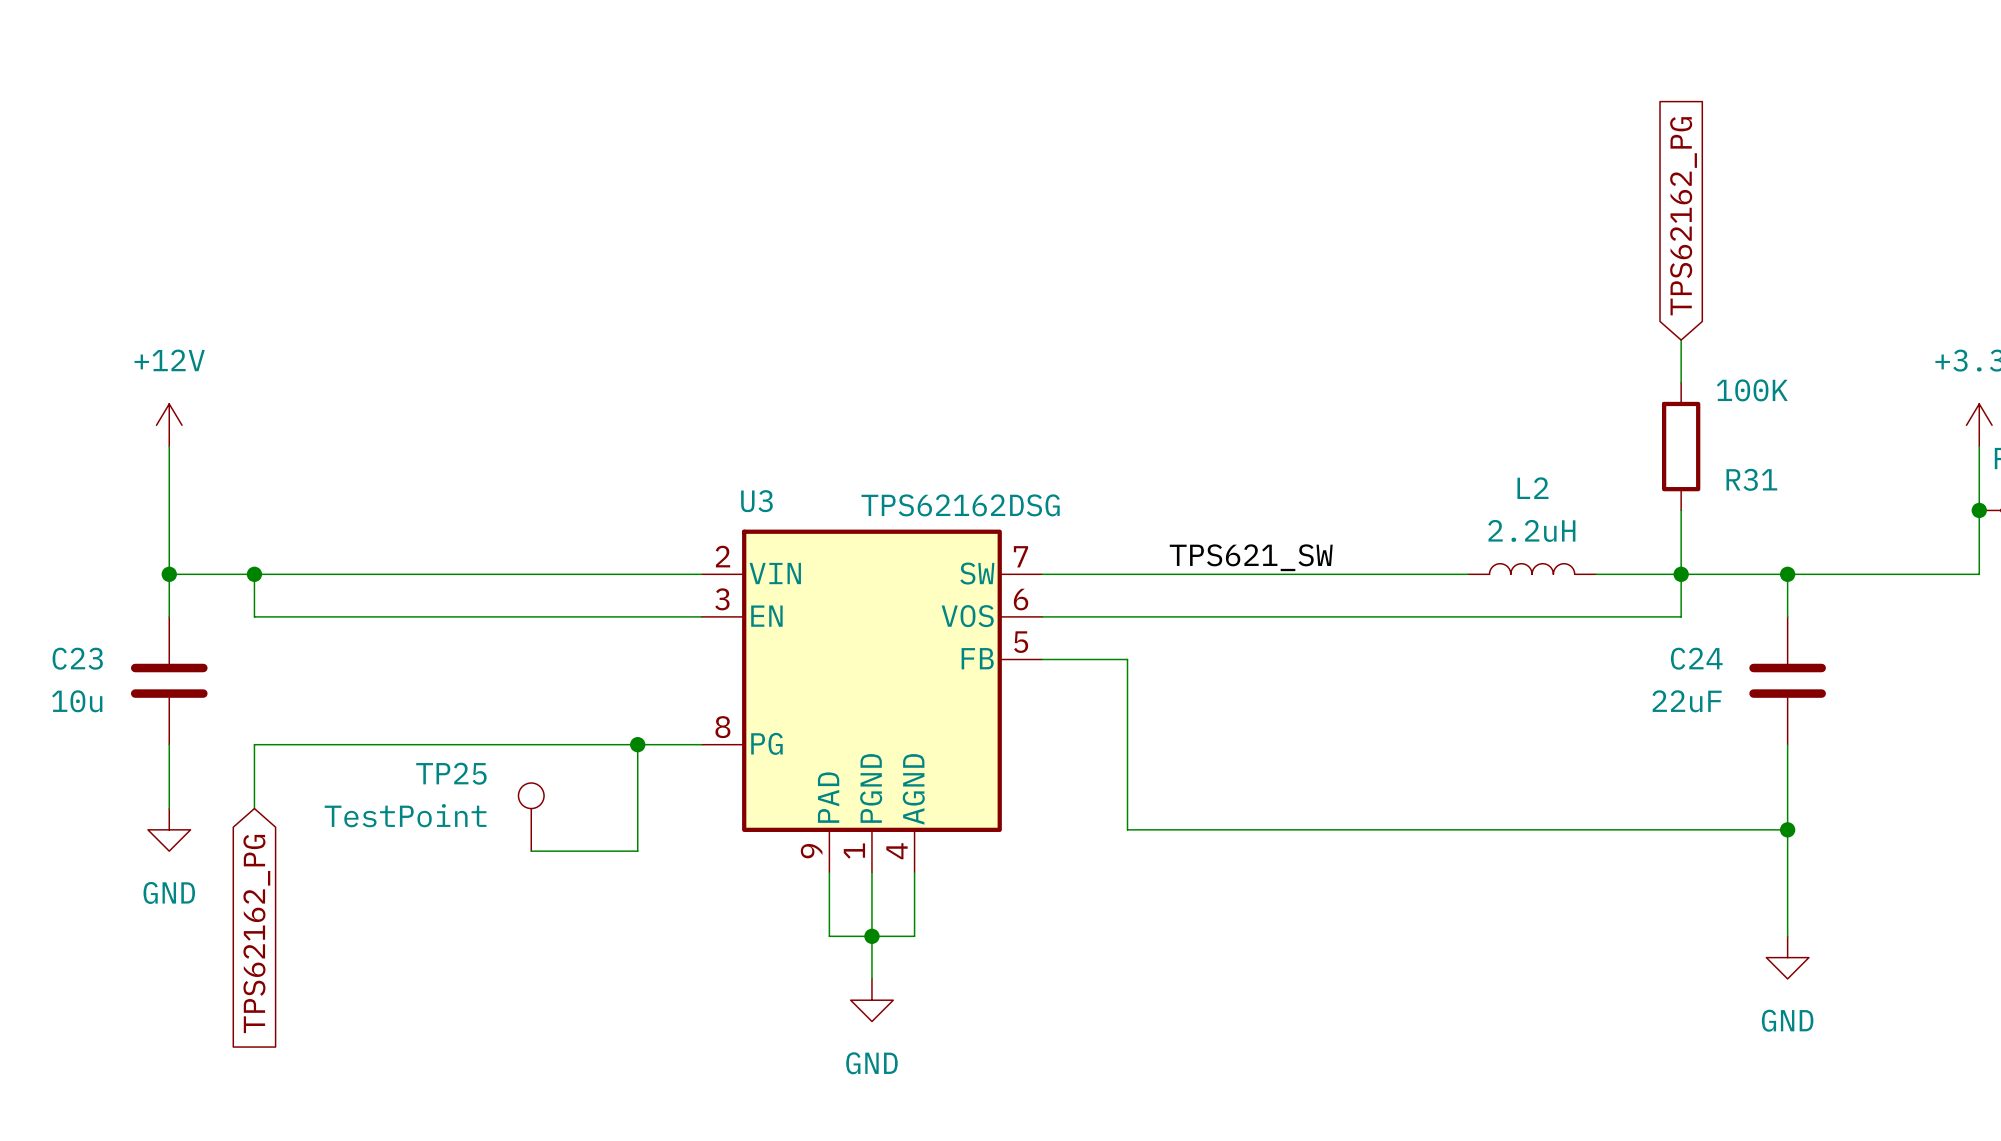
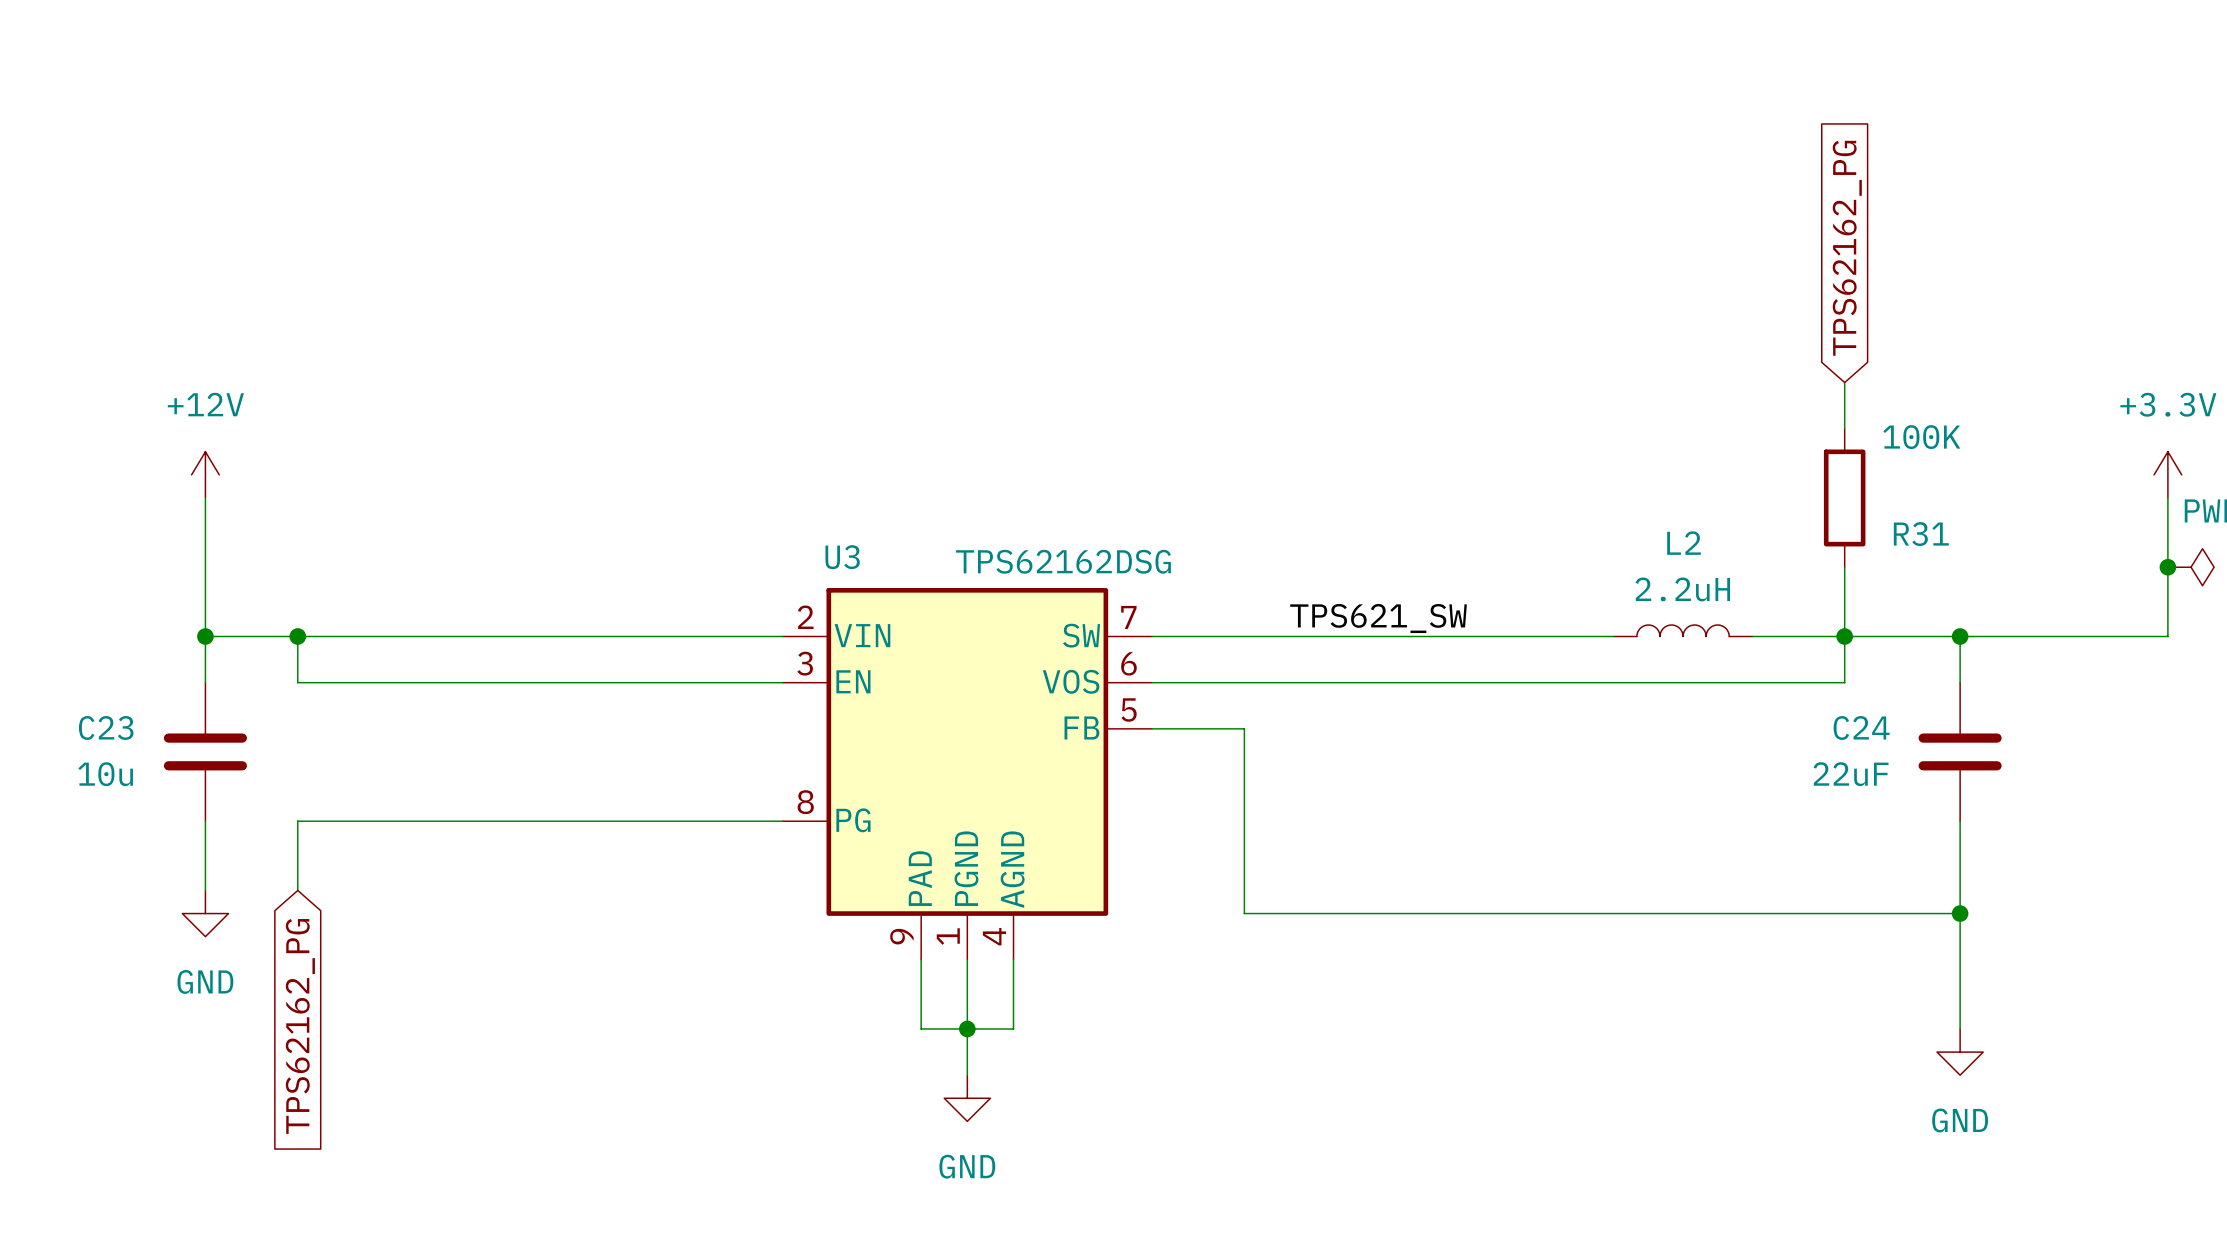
wire: (637, 744) (637, 851) (531, 851) -> none
junction: (637, 744) -> none
TP25: TestPoint (531, 817) -> none

